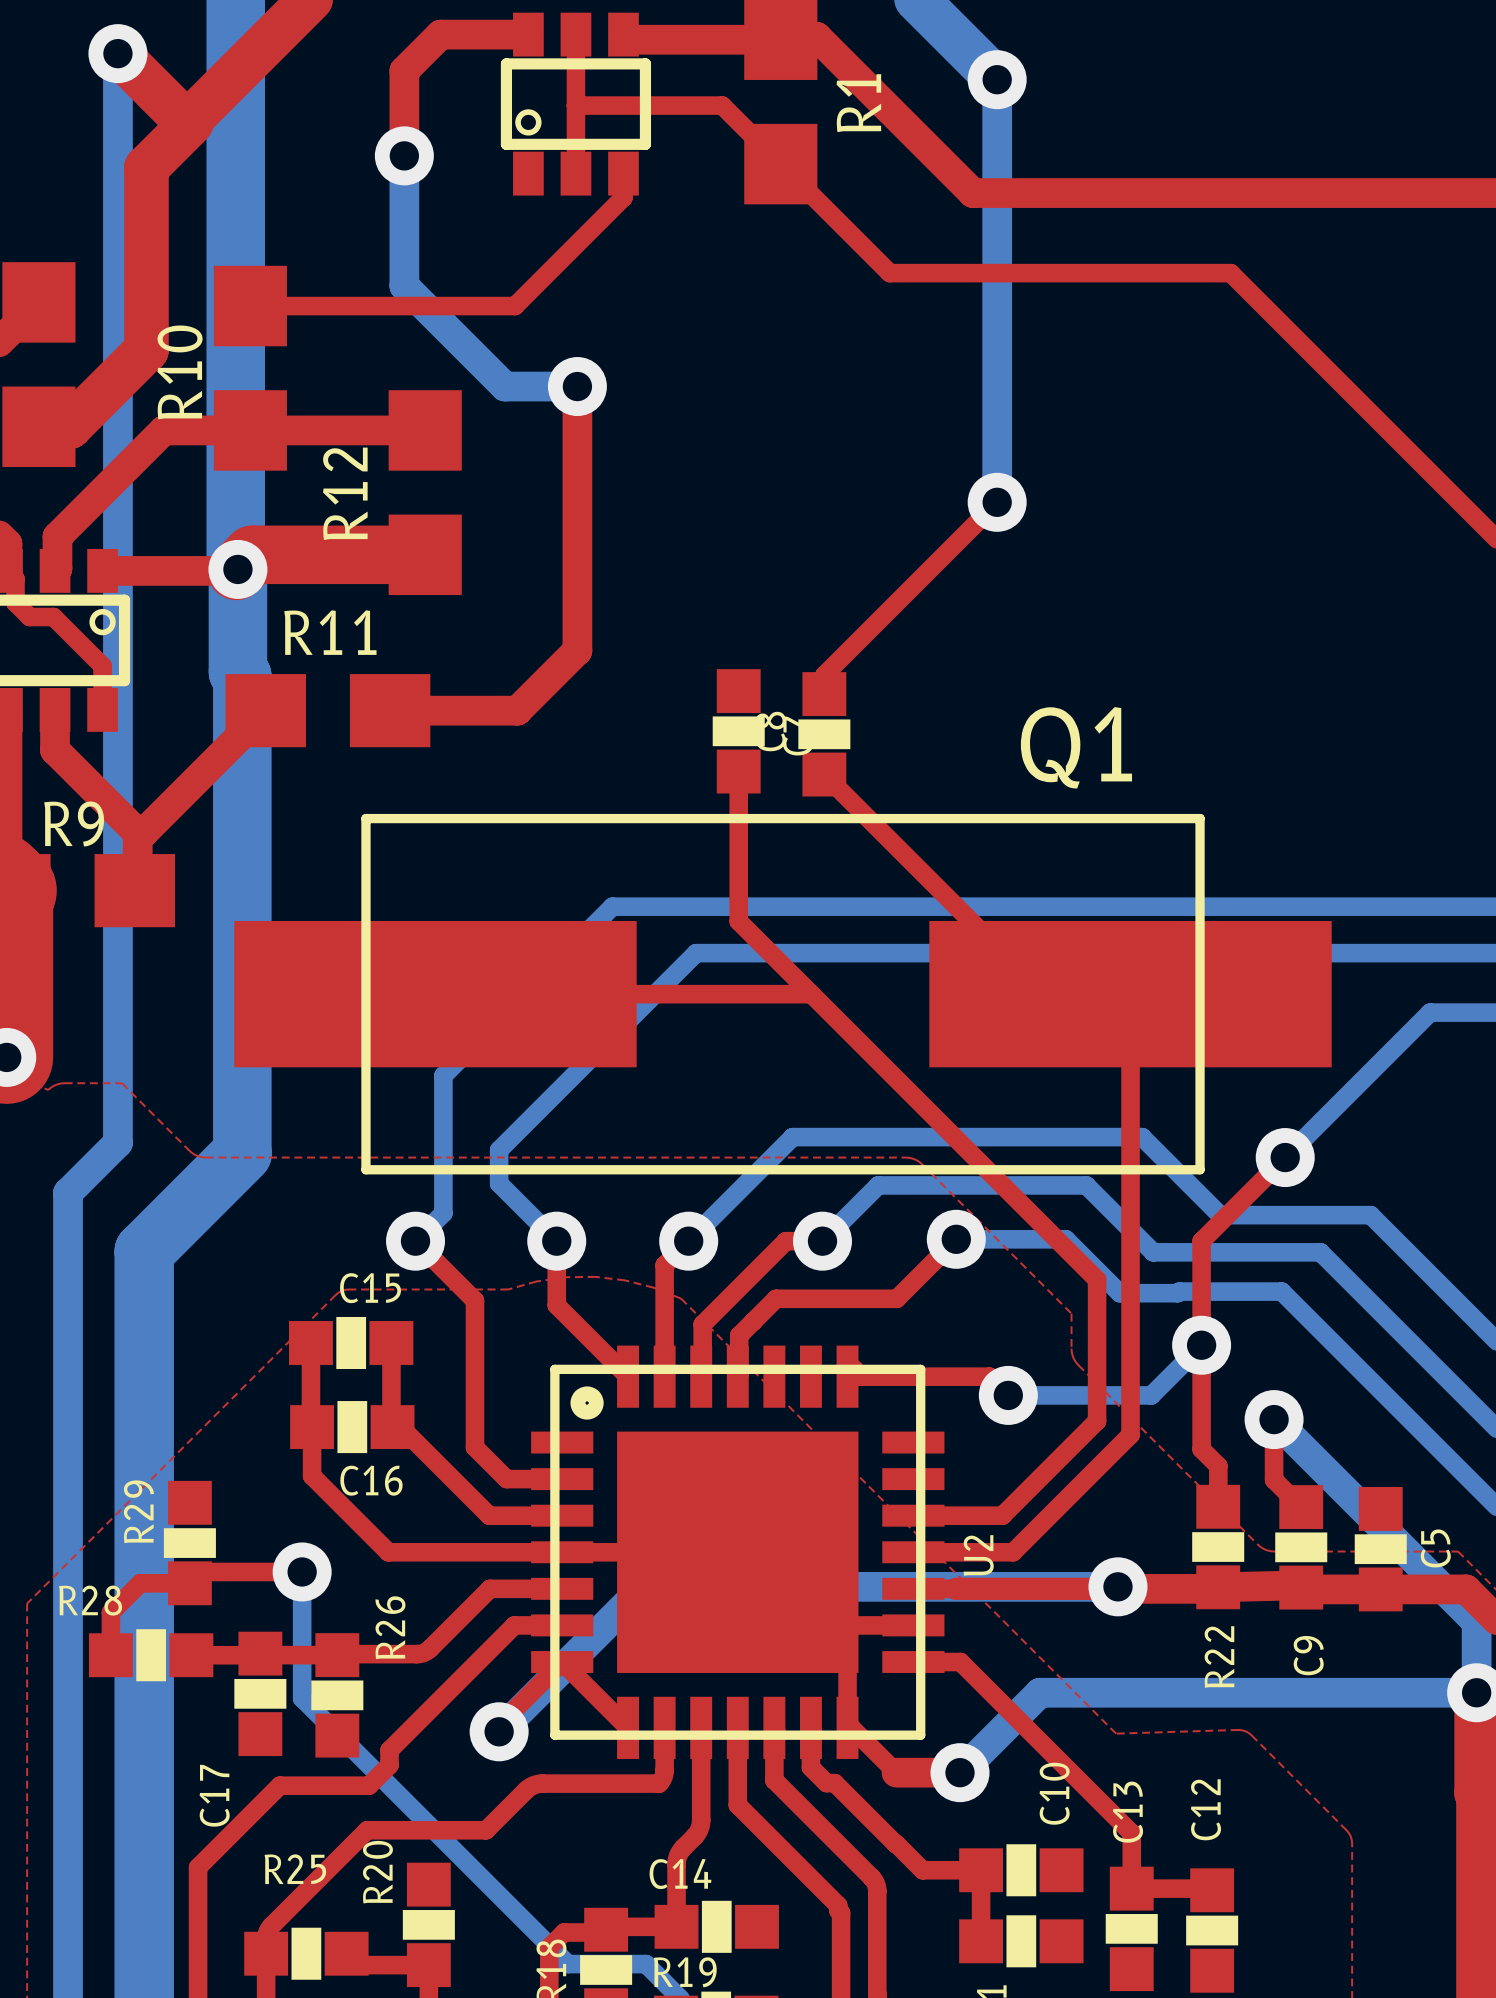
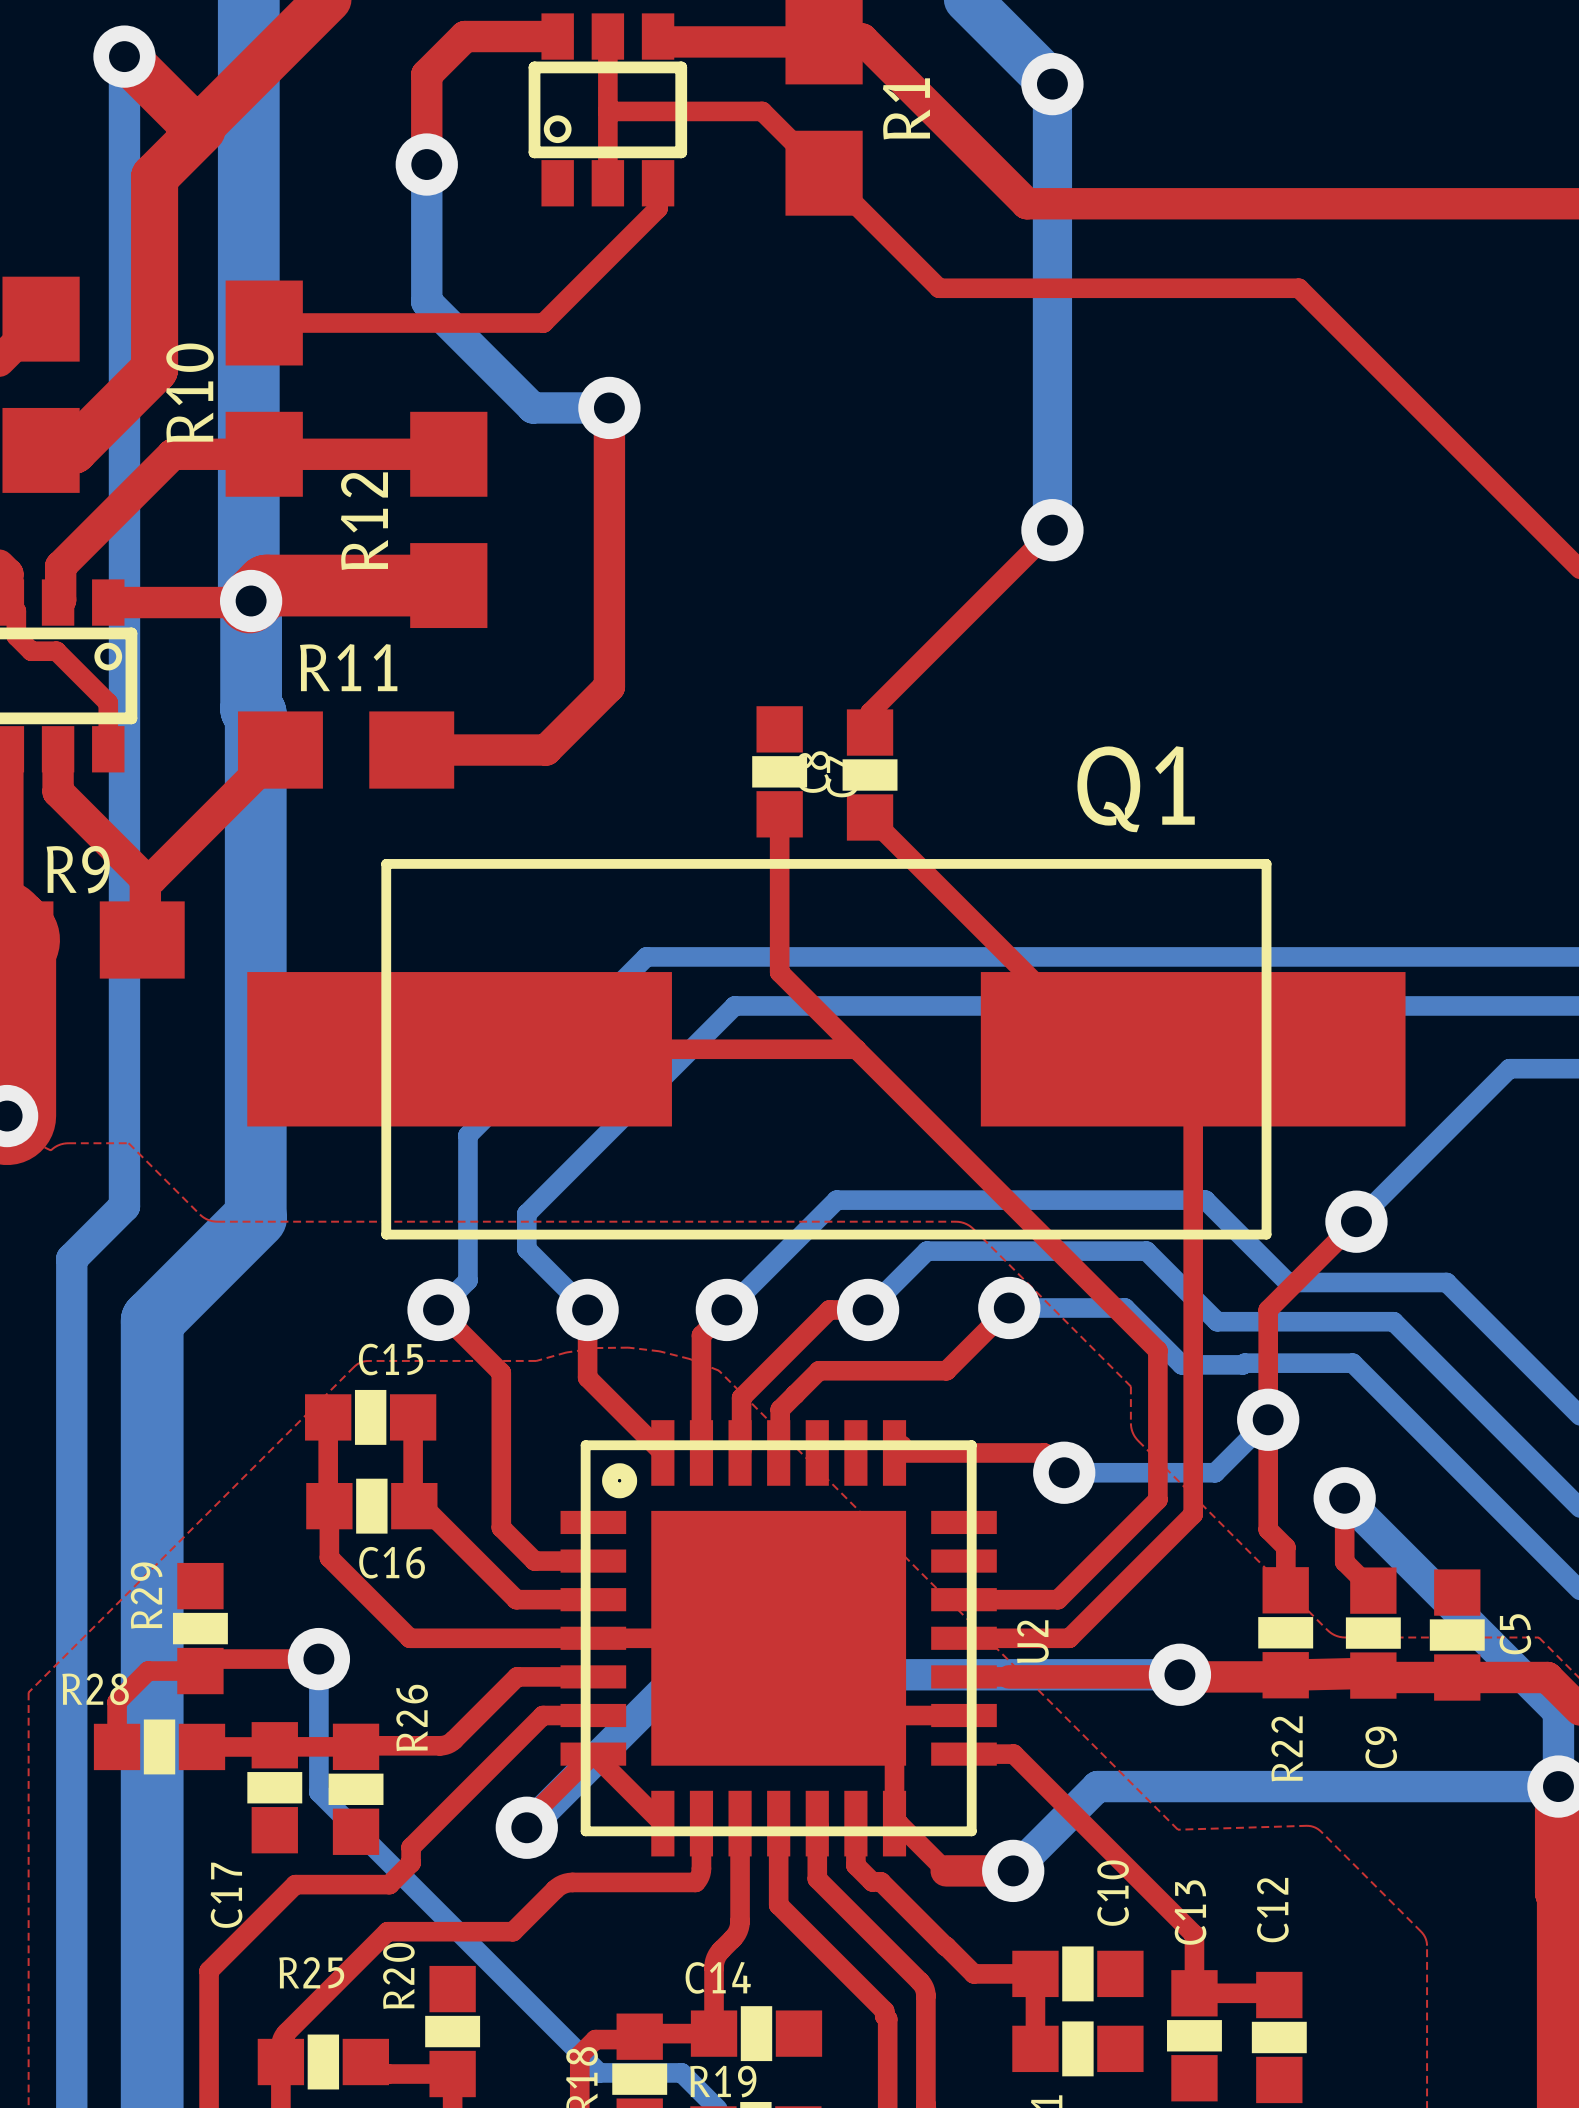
bottom track width: thin (997, 79) (997, 502) -> thick (1052, 84) (1052, 530)

